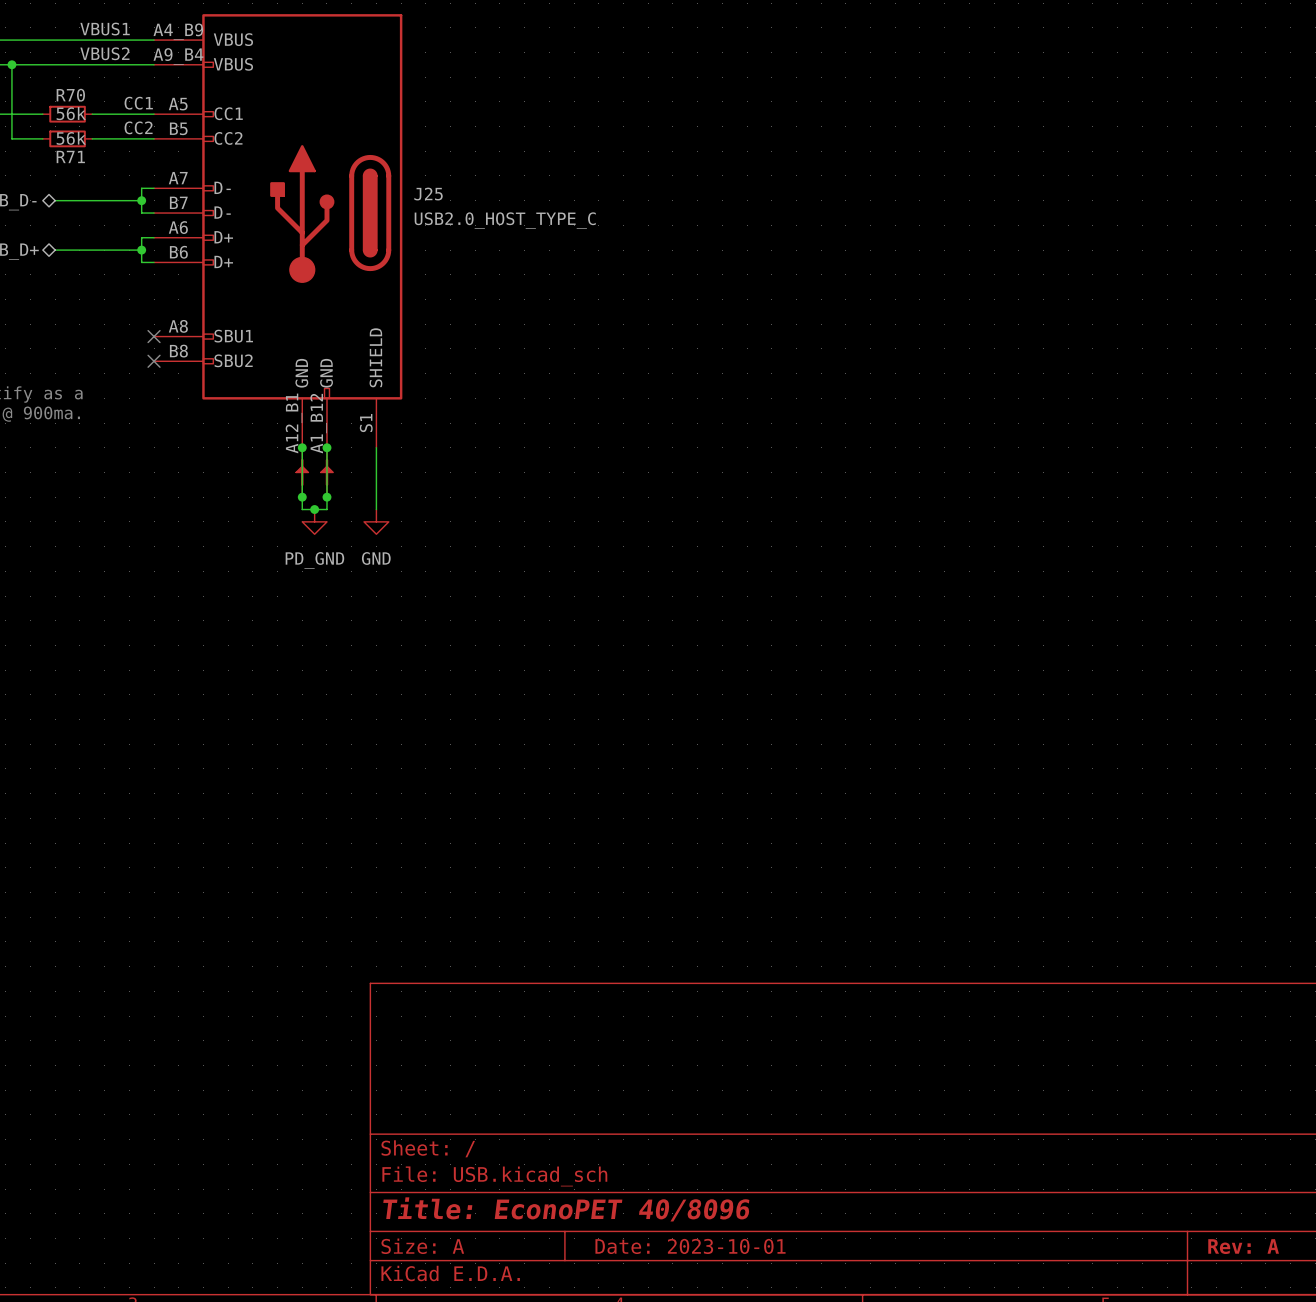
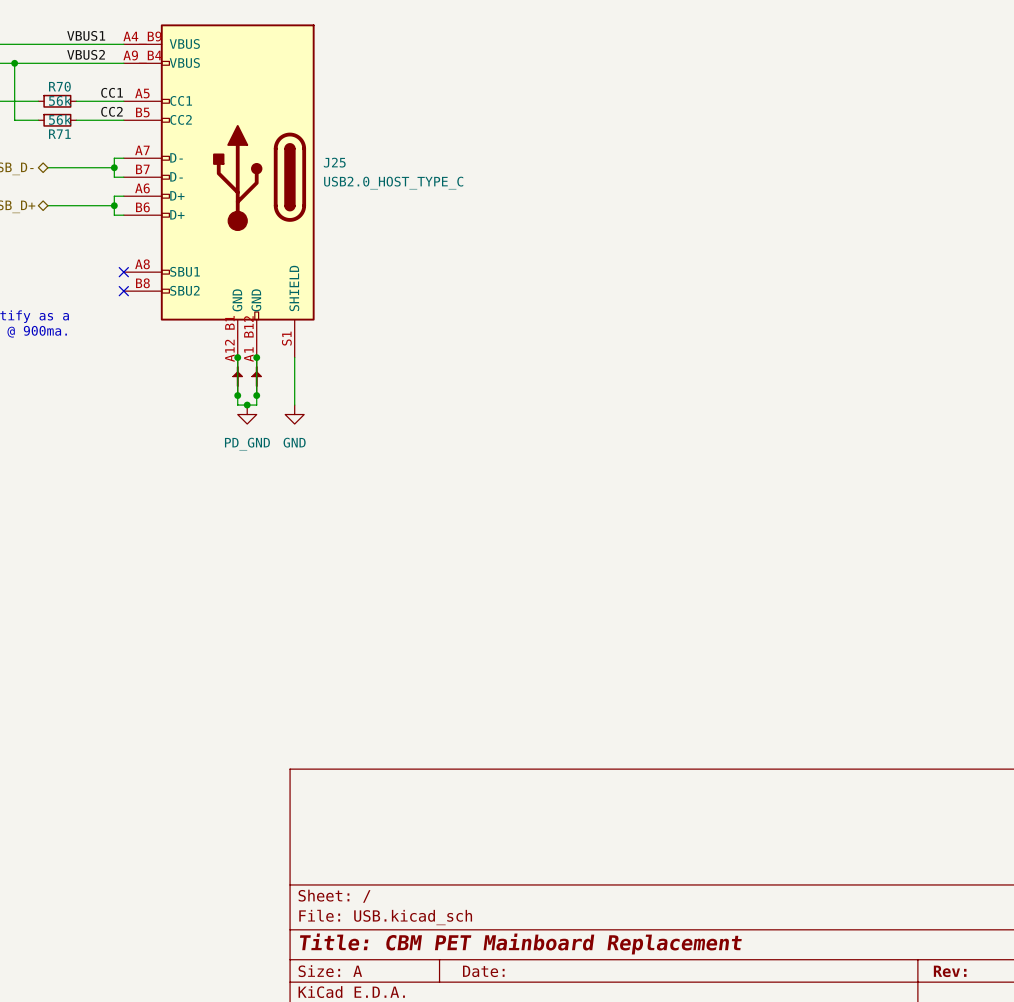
title block: Title: EconoPET 40/8096 (566, 1209) -> Title: CBM PET Mainboard Replacement (520, 943)
title block: Date: 2023-10-01 (690, 1246) -> Date: (483, 971)
title block: Rev: A (1243, 1246) -> Rev: (950, 971)

